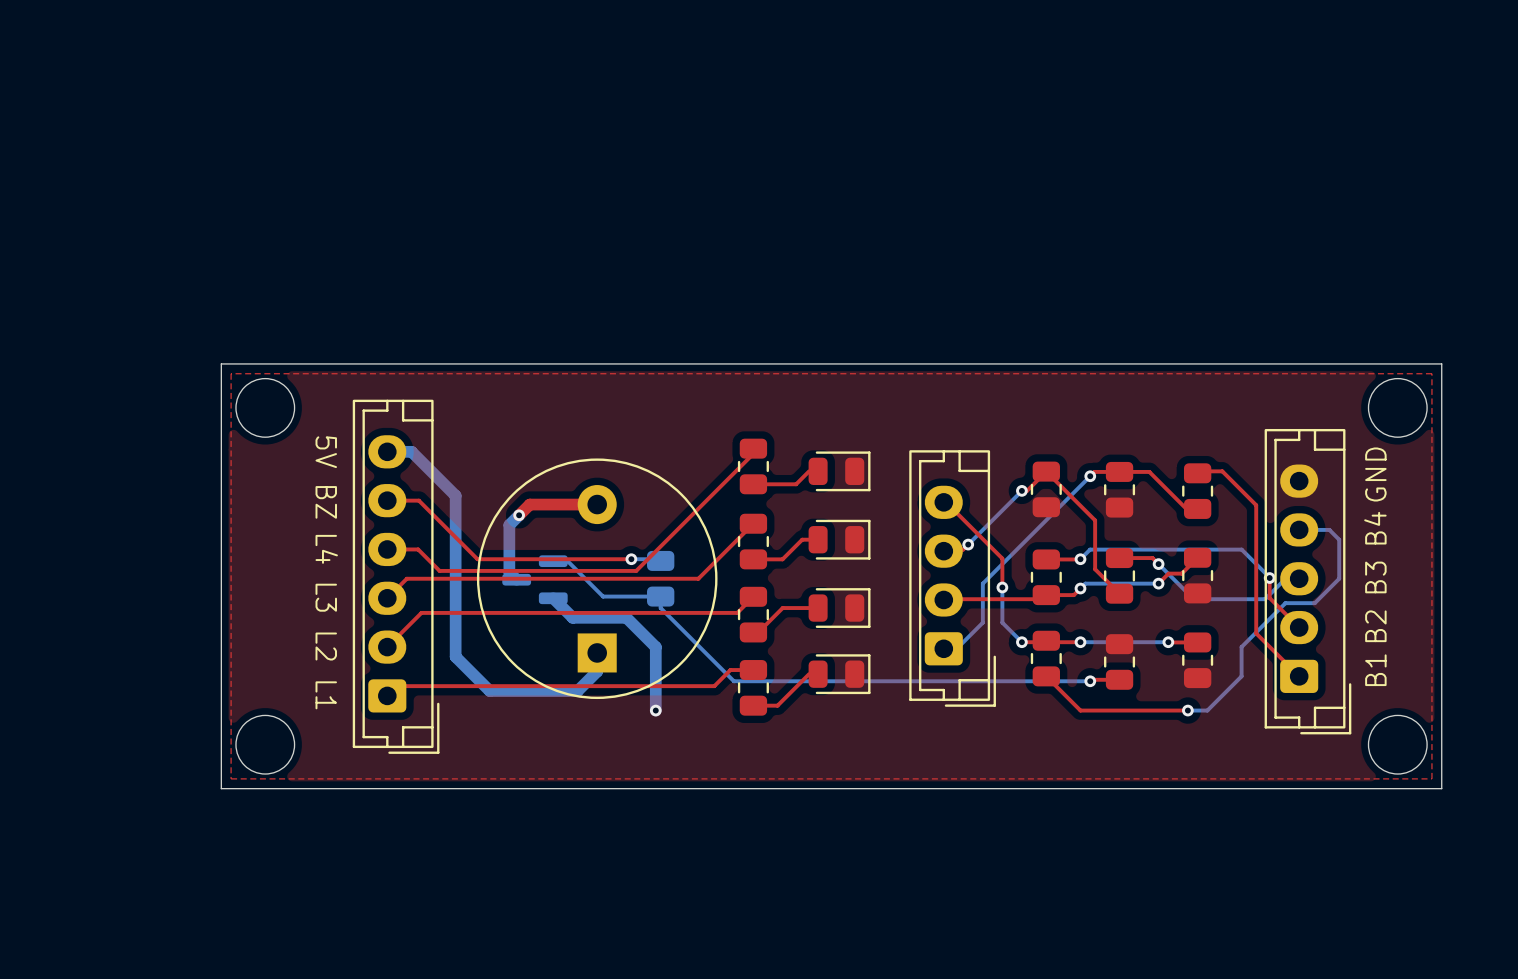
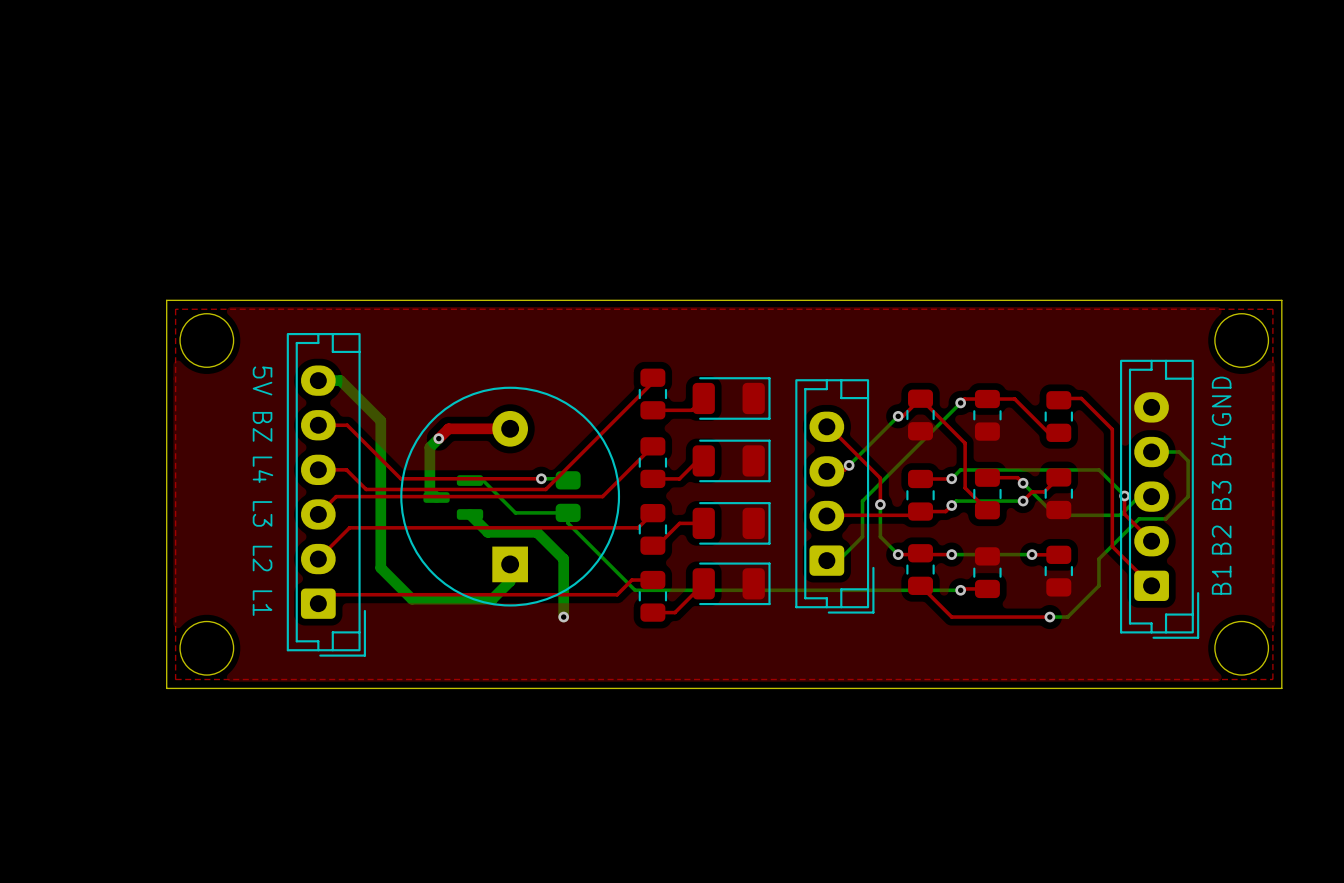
part footprint: [808, 451, 871, 492] -> [692, 377, 771, 420]
part footprint: [808, 519, 871, 560] -> [692, 439, 771, 483]
part footprint: [808, 588, 871, 628] -> [692, 502, 771, 545]
part footprint: [808, 654, 871, 695] -> [692, 562, 771, 606]

